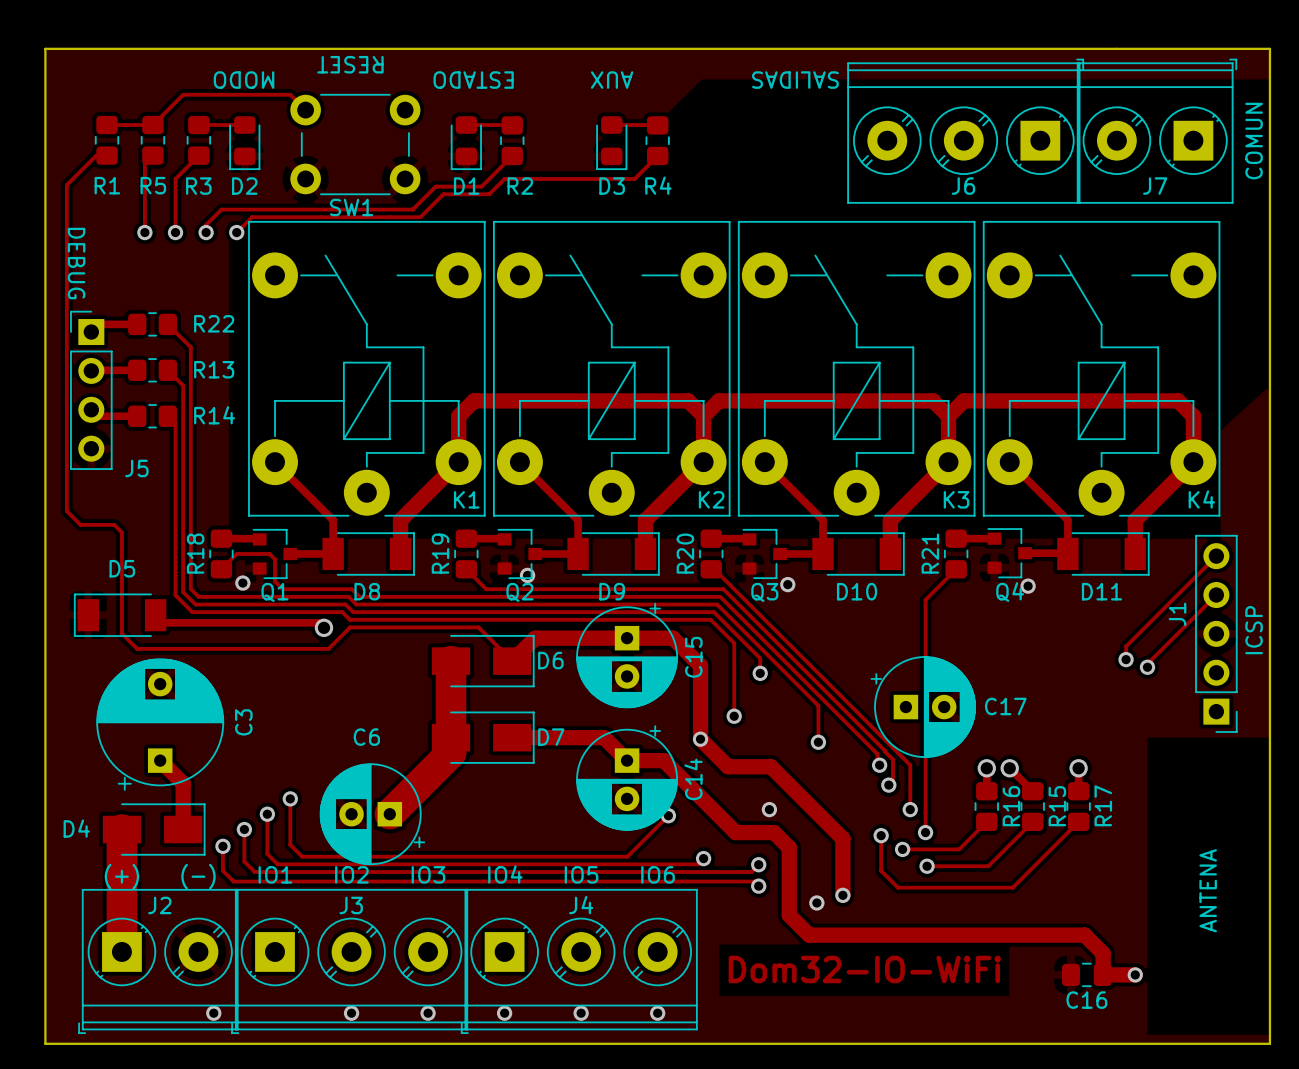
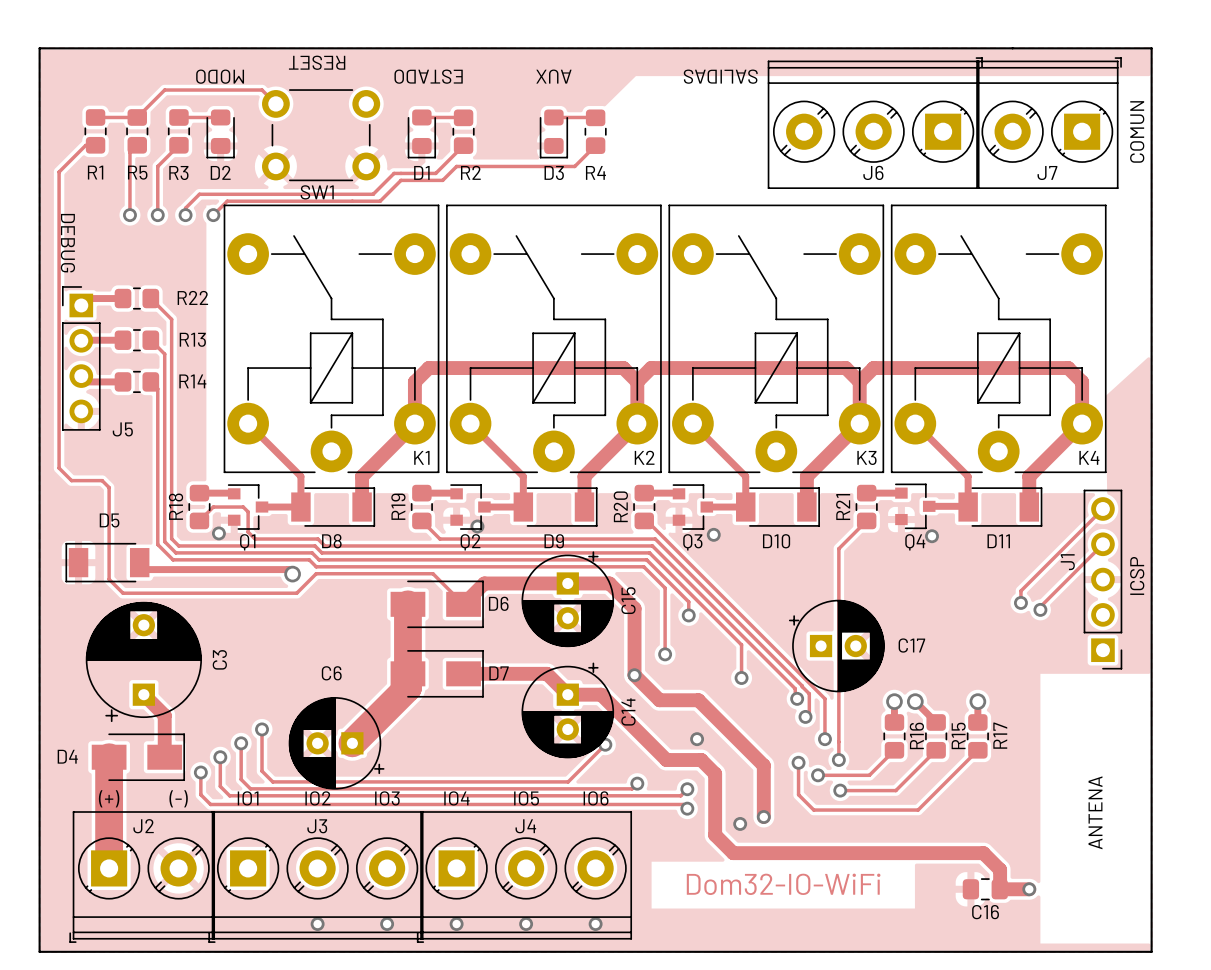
via: (213, 1013) -> none

